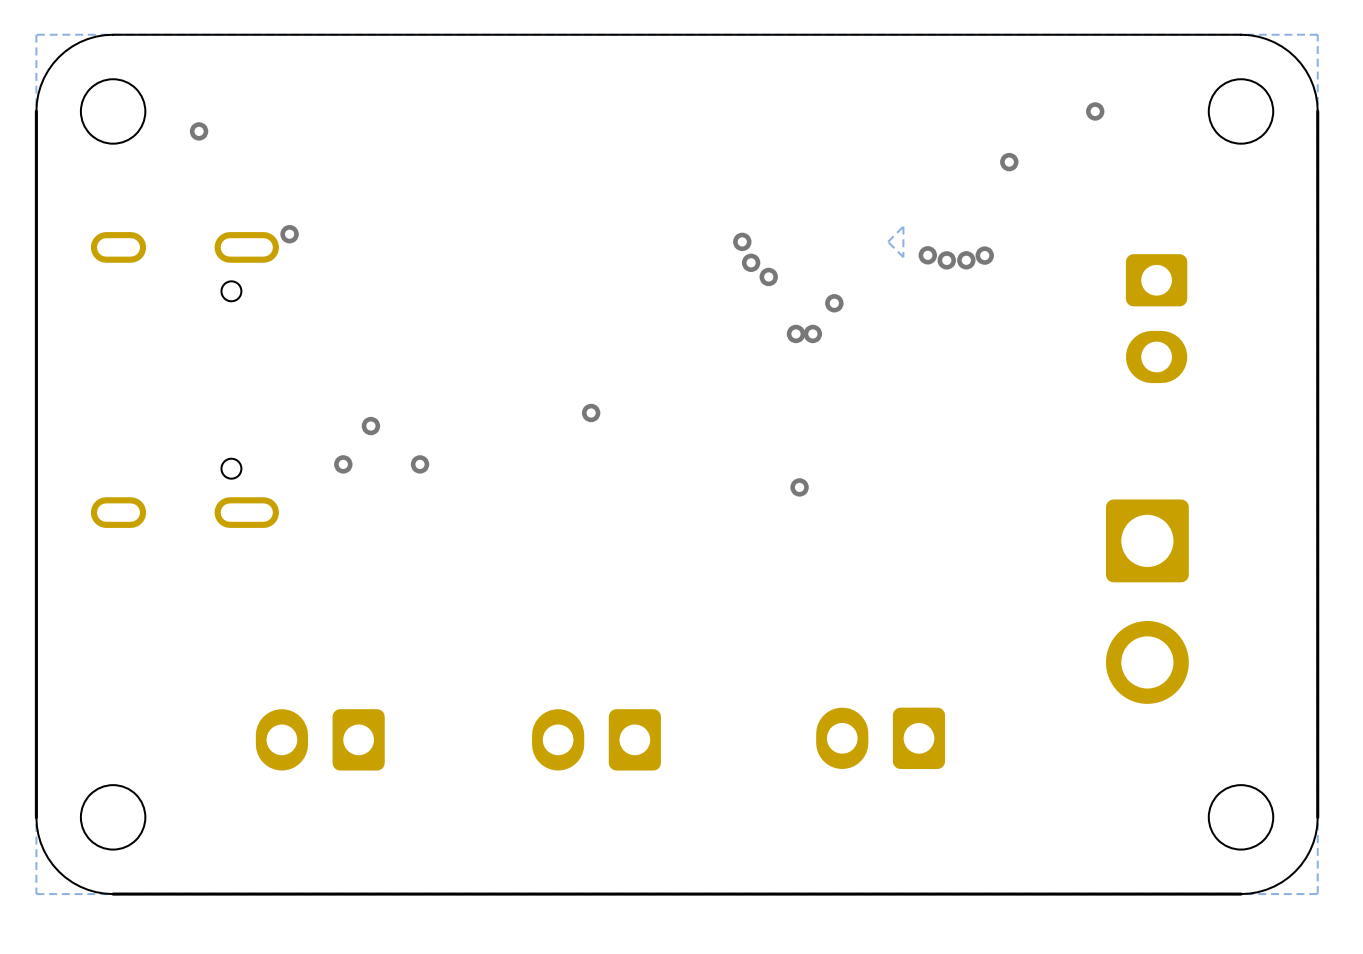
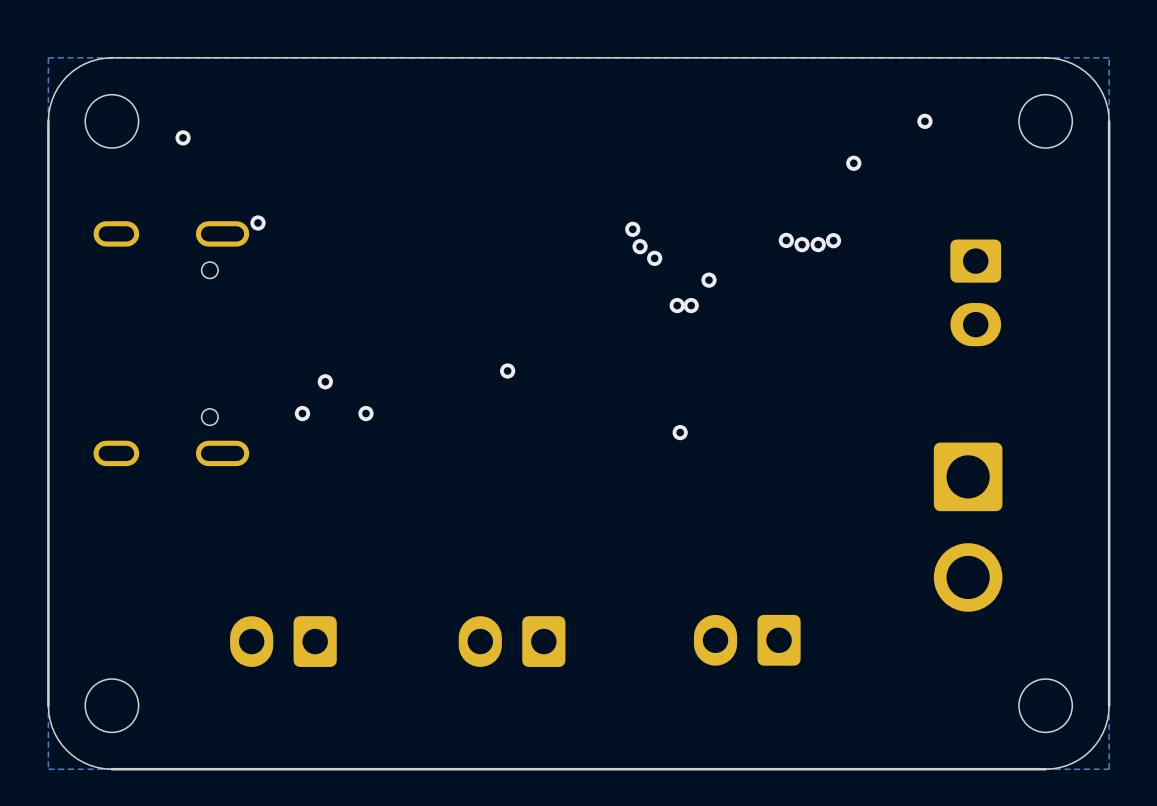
zone outline: (903, 226) (903, 257) (888, 241) (903, 226) -> none

